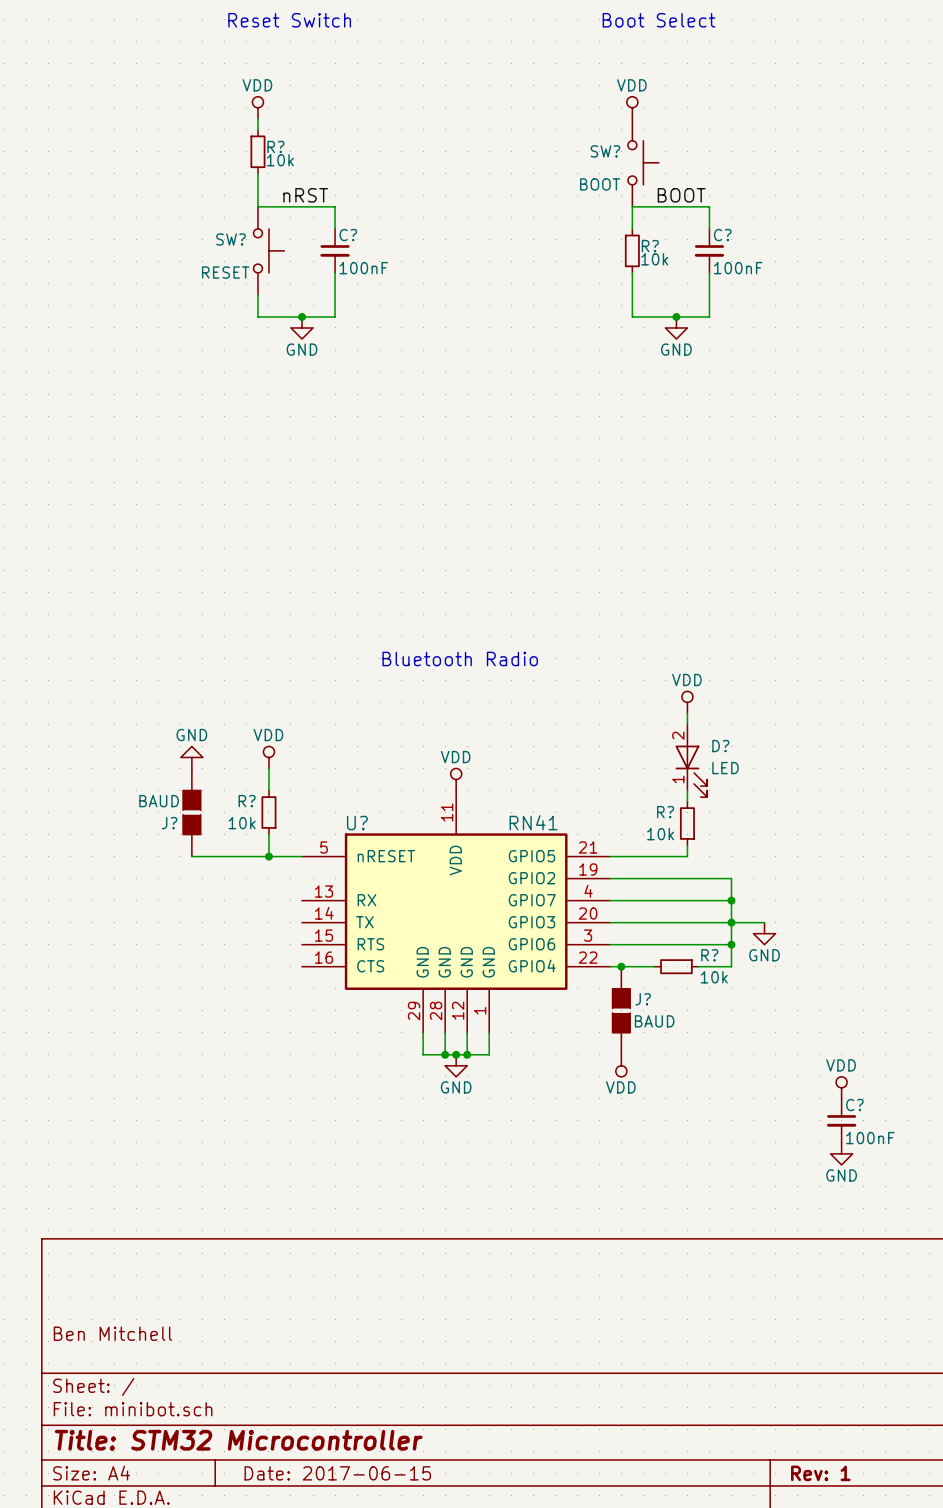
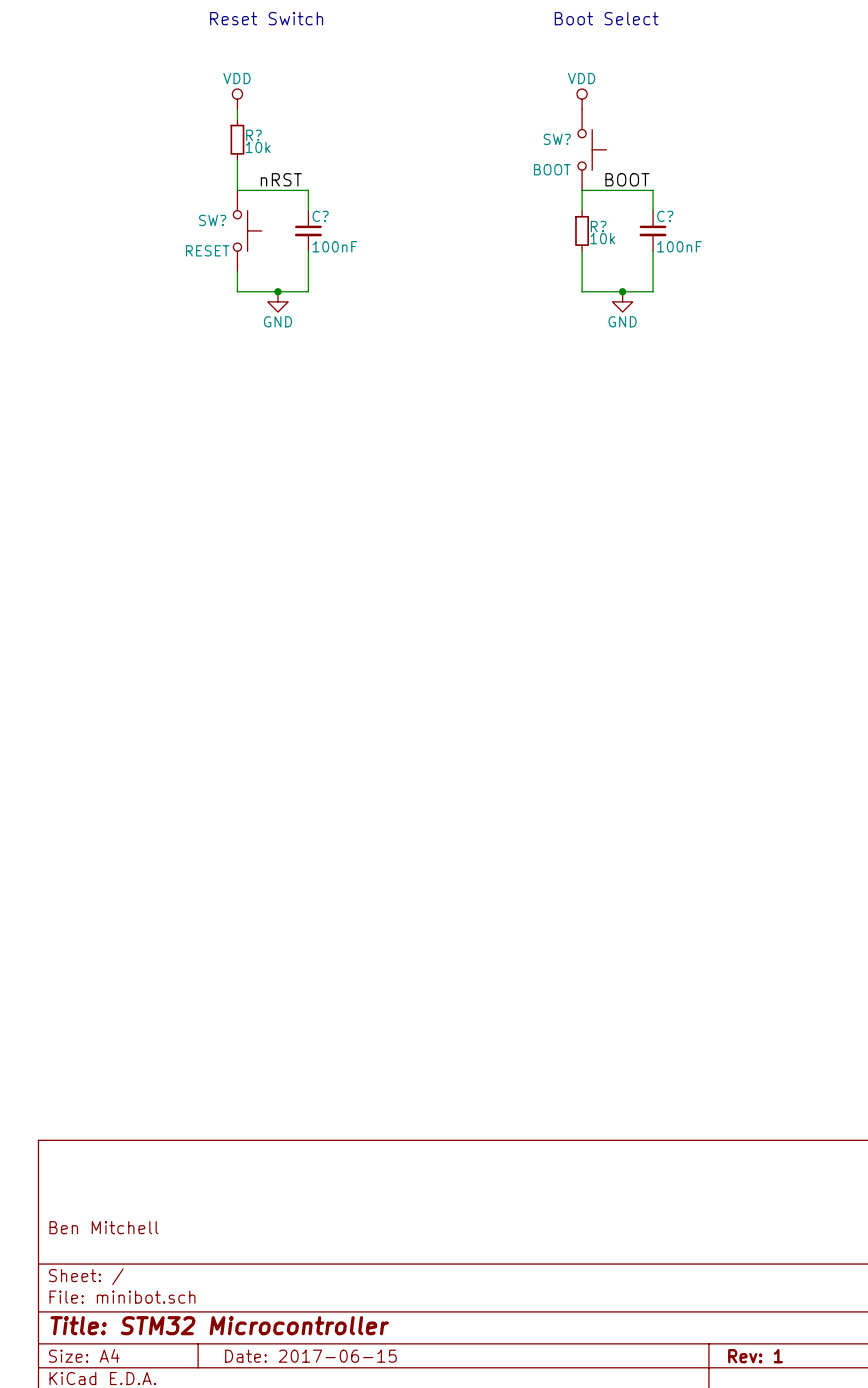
text: Bluetooth Radio (460, 658) -> none
power symbol: VDD (687, 702) -> none
wire: (687, 713) (687, 724) -> none
power symbol: GND (191, 757) -> none
power symbol: VDD (268, 757) -> none
D?: LED (691, 760) -> none
wire: (268, 768) (268, 790) -> none
power symbol: VDD (456, 779) -> none
wire: (687, 790) (687, 801) -> none
J?: BAUD (191, 812) -> none
R?: 10k (268, 812) -> none
R?: 10k (687, 823) -> none
wire: (268, 834) (268, 856) -> none
wire: (687, 845) (687, 856) (610, 856) -> none
wire: (191, 856) (302, 856) -> none
junction: (268, 856) -> none
wire: (610, 878) (731, 878) (731, 966) (698, 966) -> none
wire: (610, 900) (731, 900) -> none
junction: (731, 900) -> none
U?: RN41 (456, 911) -> none
wire: (610, 922) (764, 922) -> none
junction: (731, 922) -> none
power symbol: GND (764, 933) -> none
wire: (610, 944) (731, 944) -> none
junction: (731, 944) -> none
wire: (610, 966) (654, 966) -> none
junction: (621, 966) -> none
R?: 10k (676, 966) -> none
J?: BAUD (621, 1010) -> none
wire: (423, 1032) (423, 1054) (489, 1054) (489, 1032) -> none
wire: (445, 1032) (445, 1054) -> none
wire: (467, 1032) (467, 1054) -> none
junction: (445, 1054) -> none
junction: (456, 1054) -> none
junction: (467, 1054) -> none
power symbol: GND (456, 1065) -> none
power symbol: VDD (621, 1065) -> none
power symbol: VDD (841, 1087) -> none
C?: 100nF (841, 1120) -> none
power symbol: GND (841, 1153) -> none

